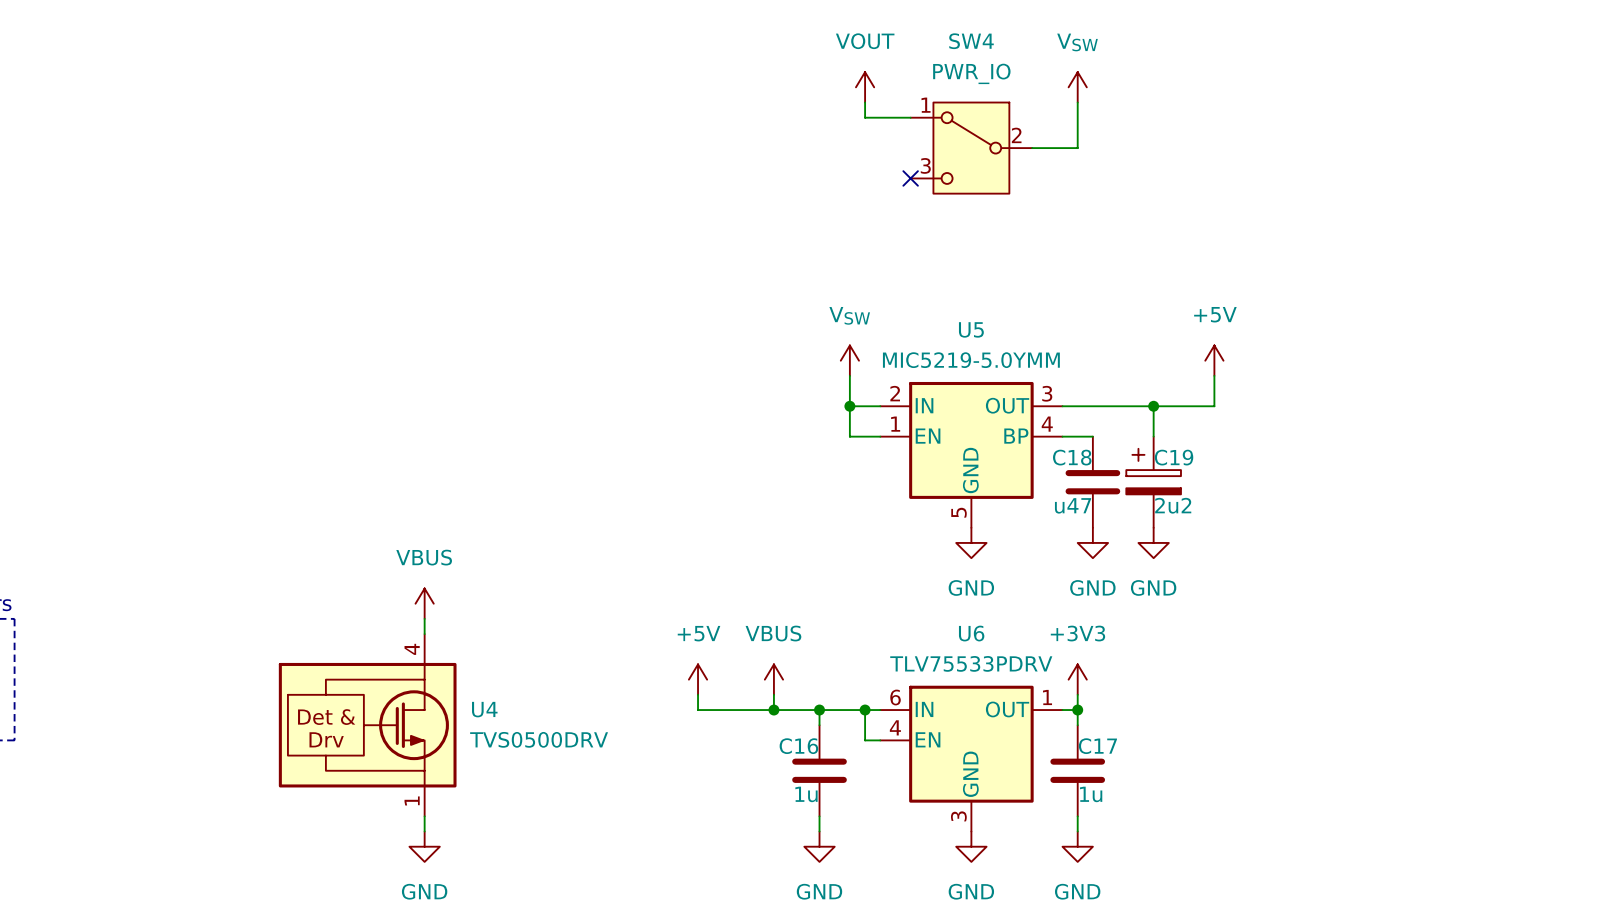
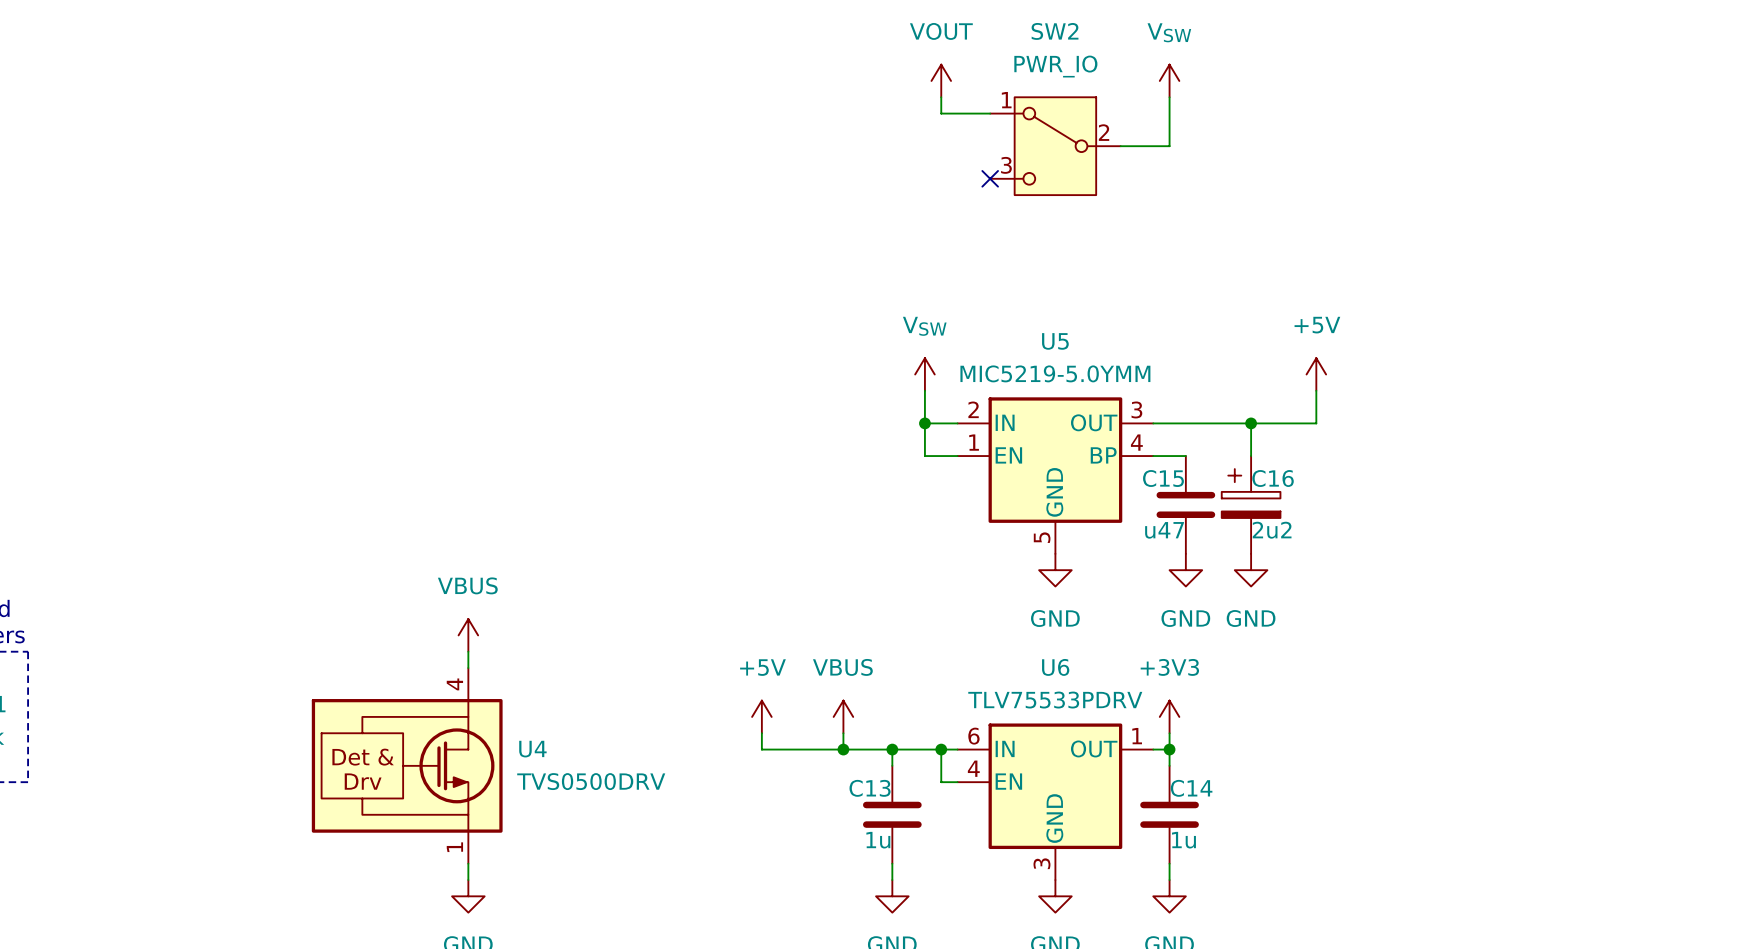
SW4 name: SW4 (971, 41) -> SW2 (1055, 31)
C18 name: C18 (1072, 457) -> C15 (1163, 478)
C19 name: C19 (1174, 457) -> C16 (1273, 478)
C16 name: C16 (798, 746) -> C13 (870, 788)
C17 name: C17 (1097, 746) -> C14 (1191, 788)

